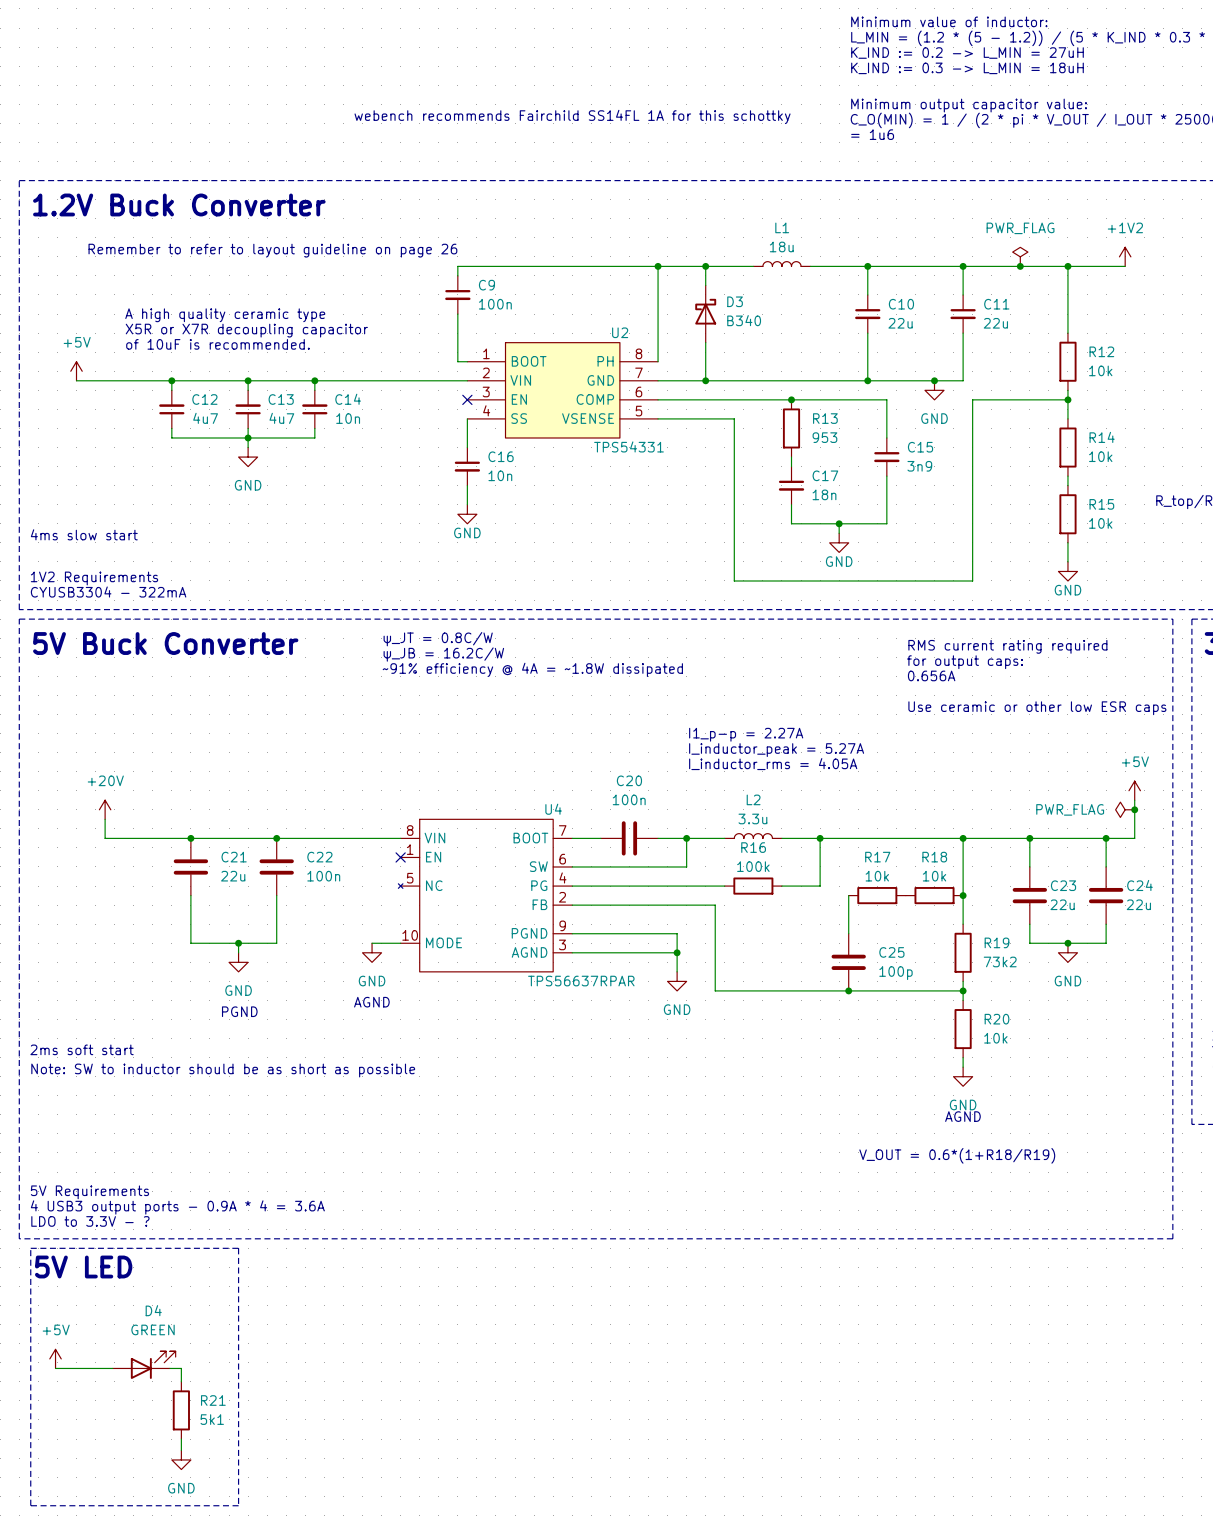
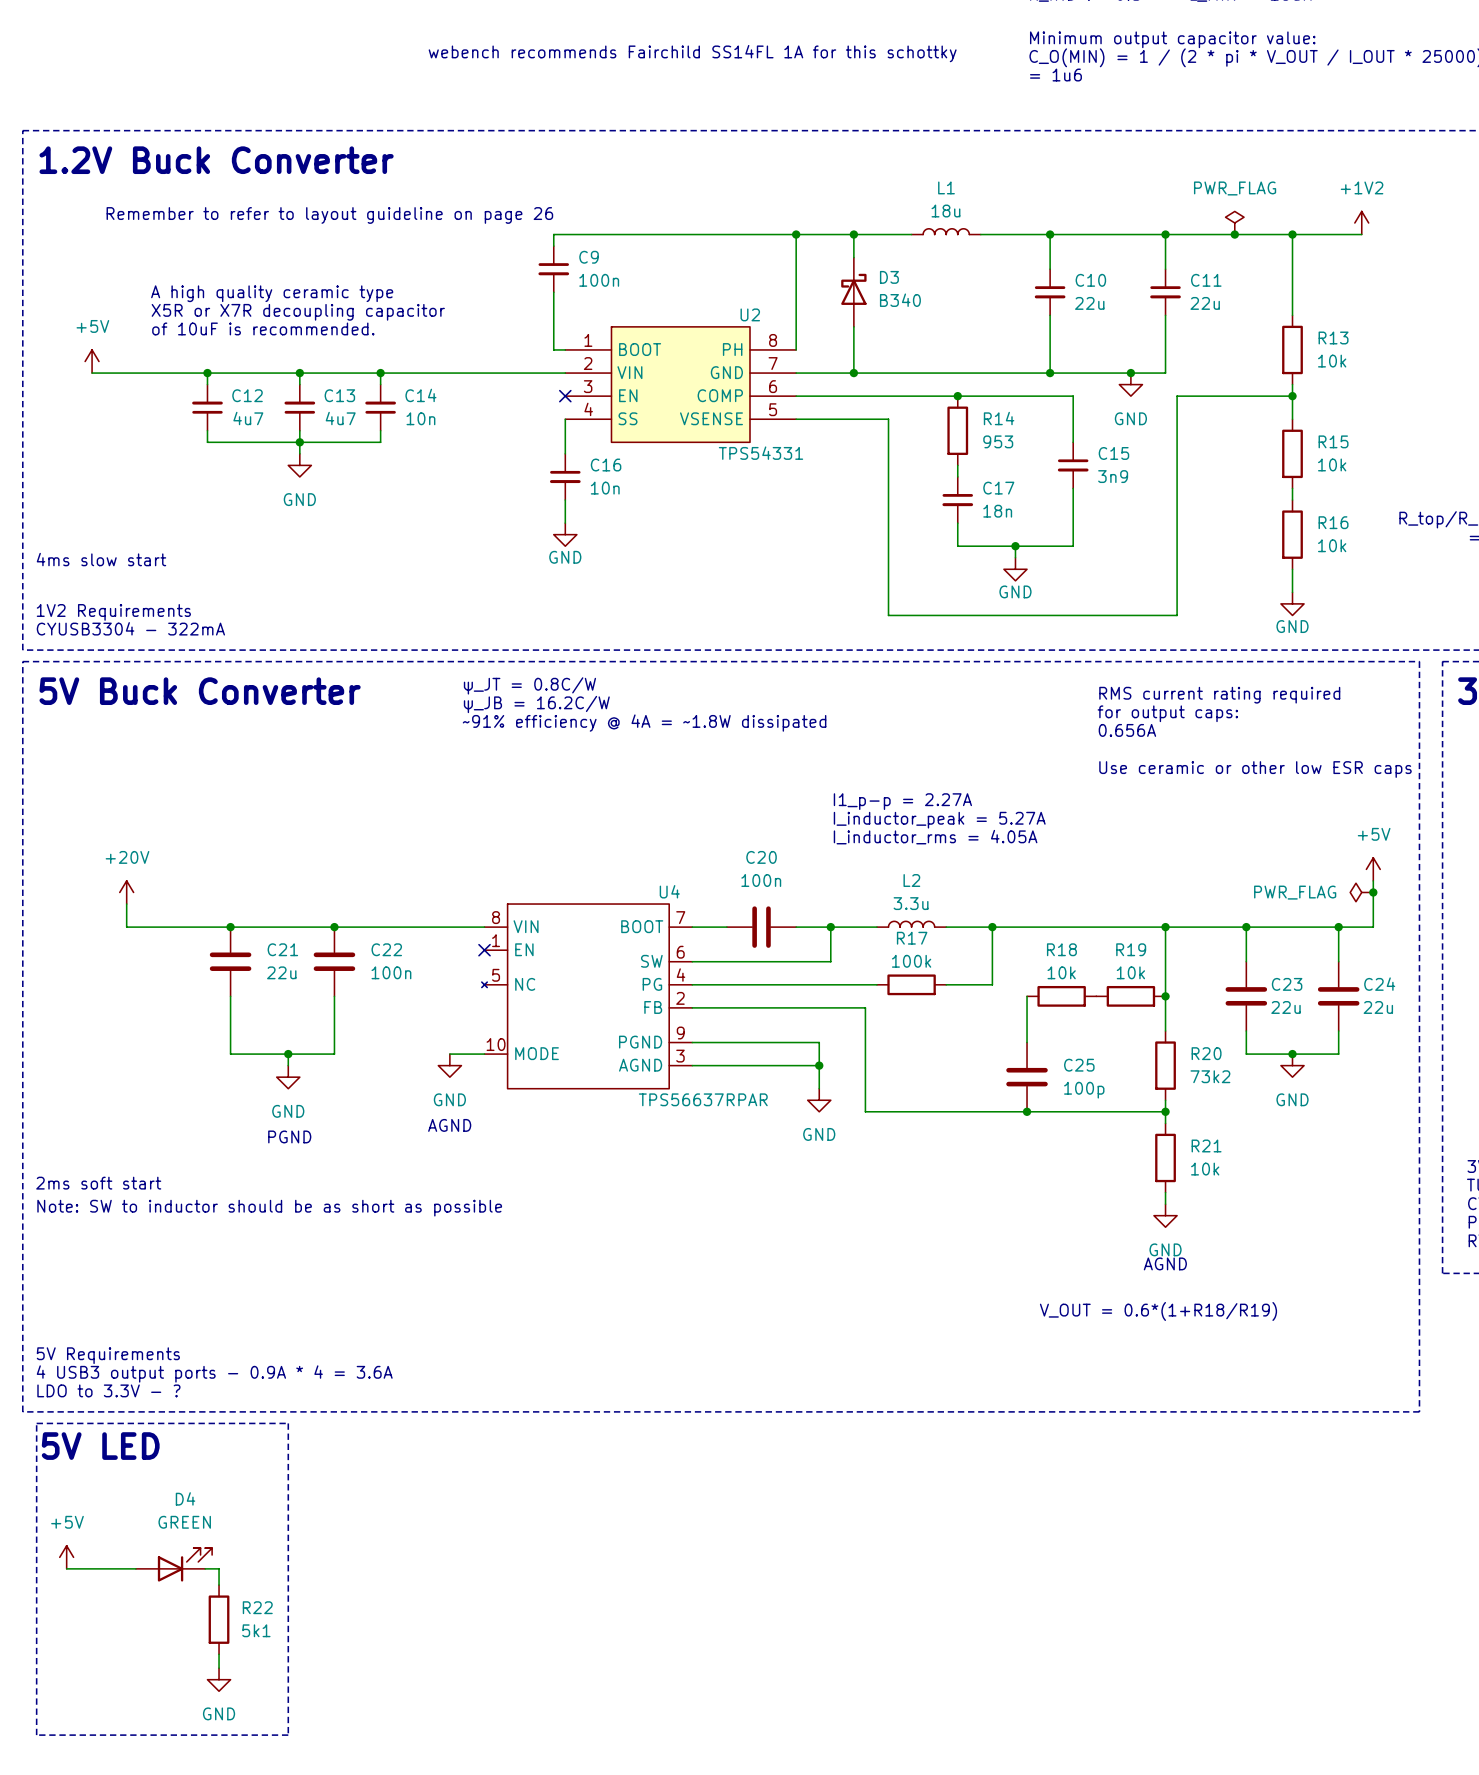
R12 name: R12 (1101, 351) -> R13 (1333, 337)
R13 name: R13 (825, 418) -> R14 (999, 418)
R14 name: R14 (1102, 437) -> R15 (1333, 441)
R15 name: R15 (1101, 504) -> R16 (1333, 522)
R16 name: R16 (753, 847) -> R17 (912, 938)
R17 name: R17 (877, 857) -> R18 (1061, 949)
R18 name: R18 (934, 857) -> R19 (1131, 949)
R19 name: R19 (997, 942) -> R20 (1206, 1053)
R20 name: R20 (997, 1019) -> R21 (1206, 1145)
R21 name: R21 (213, 1400) -> R22 (257, 1607)

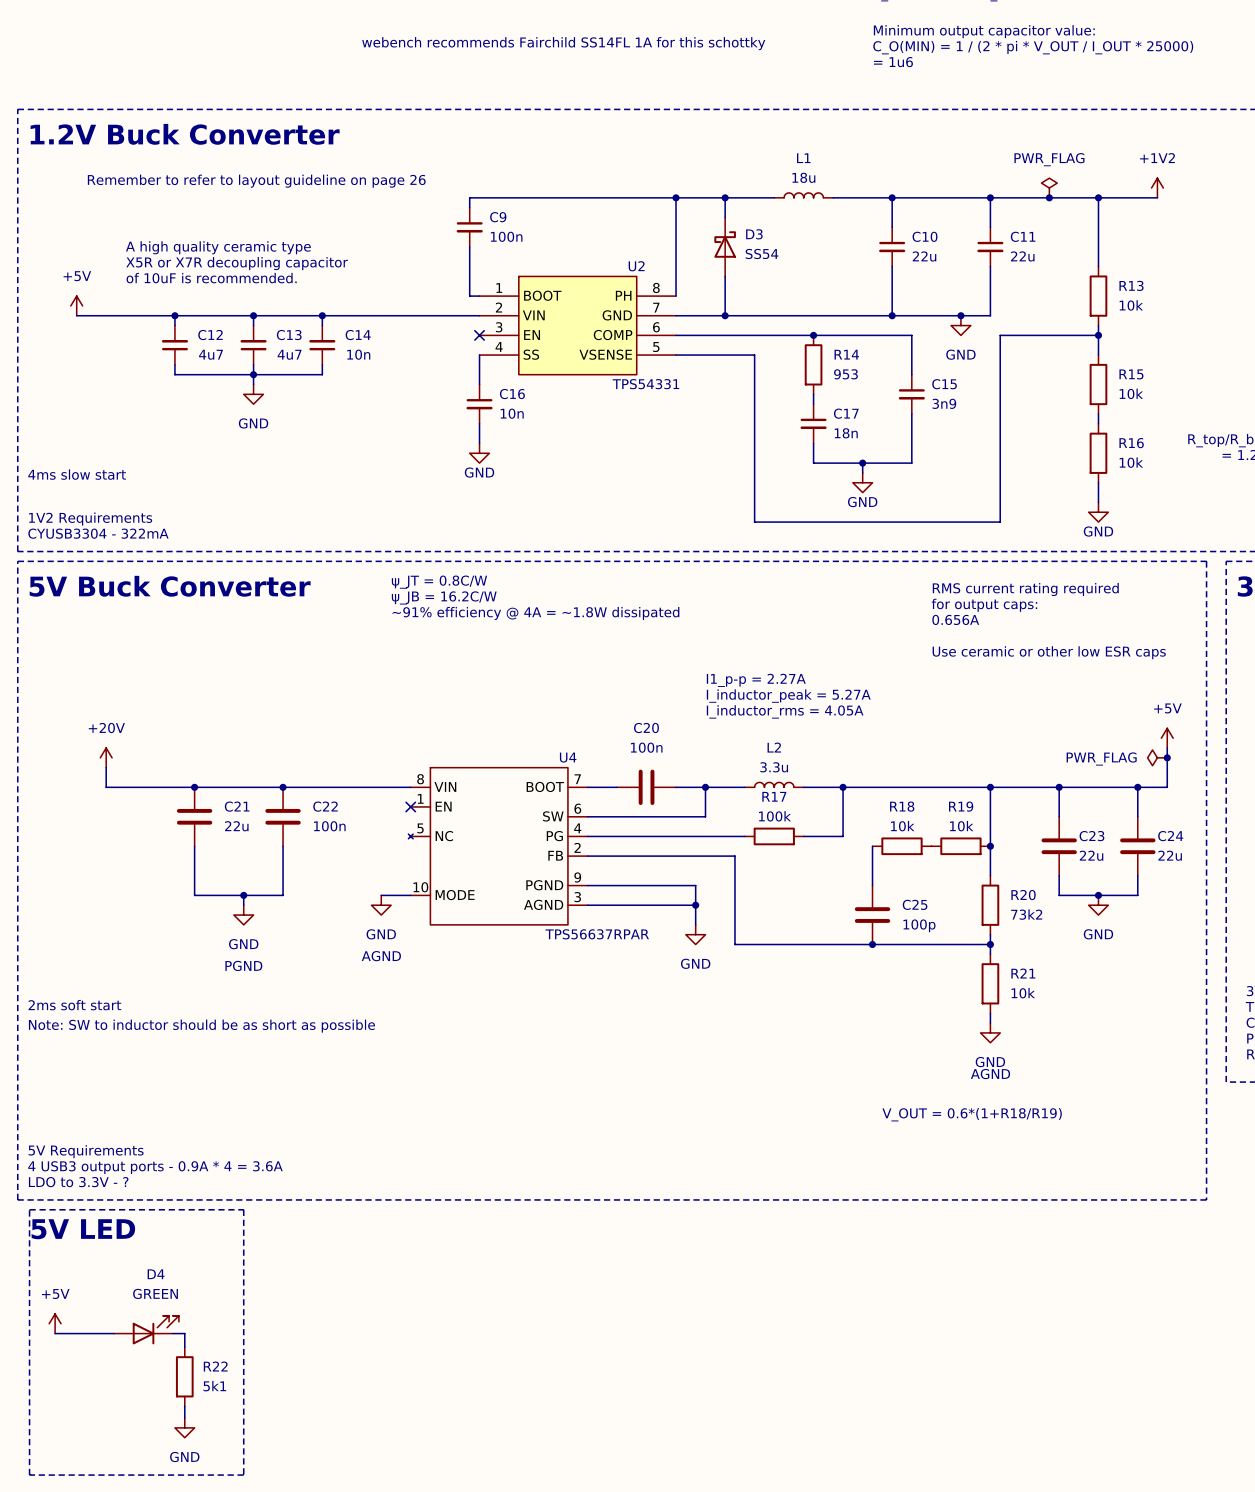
D3 value: B340 (900, 300) -> SS54 (761, 253)

